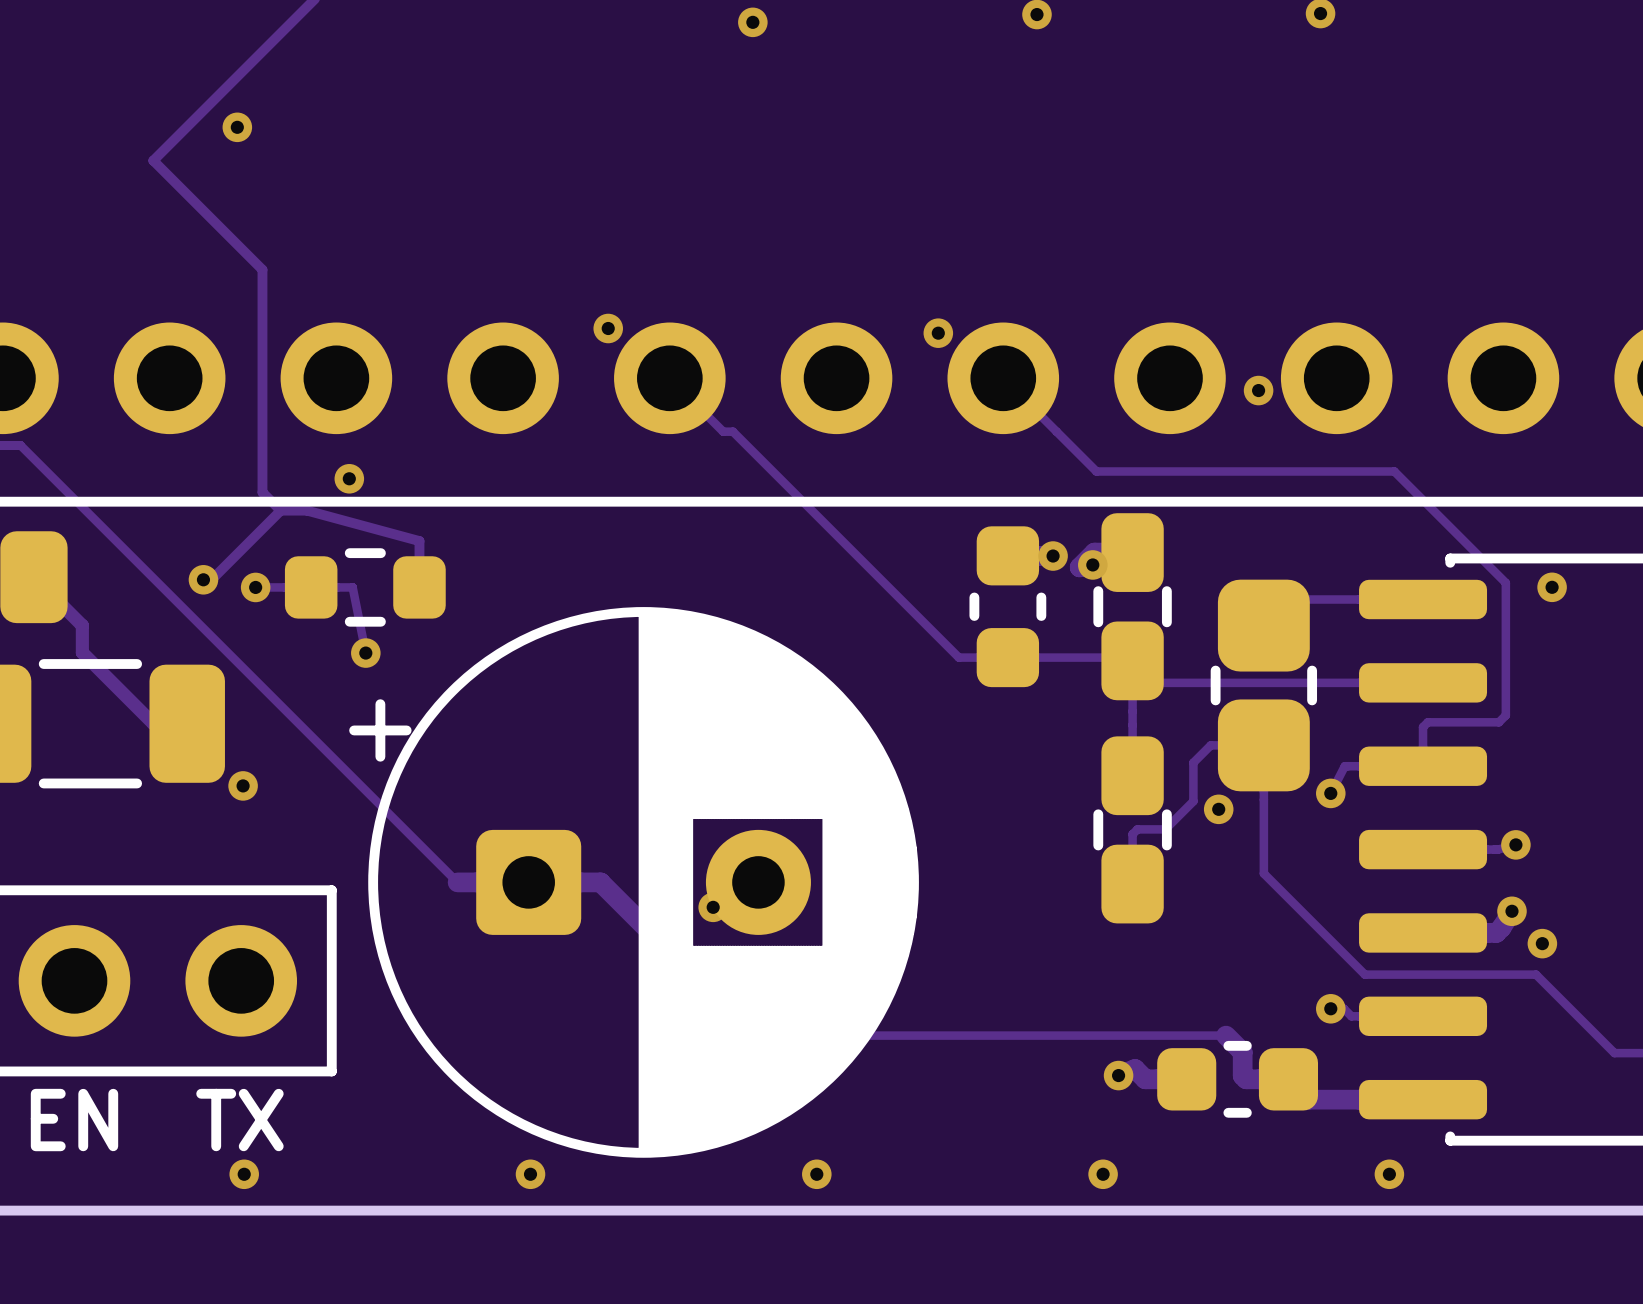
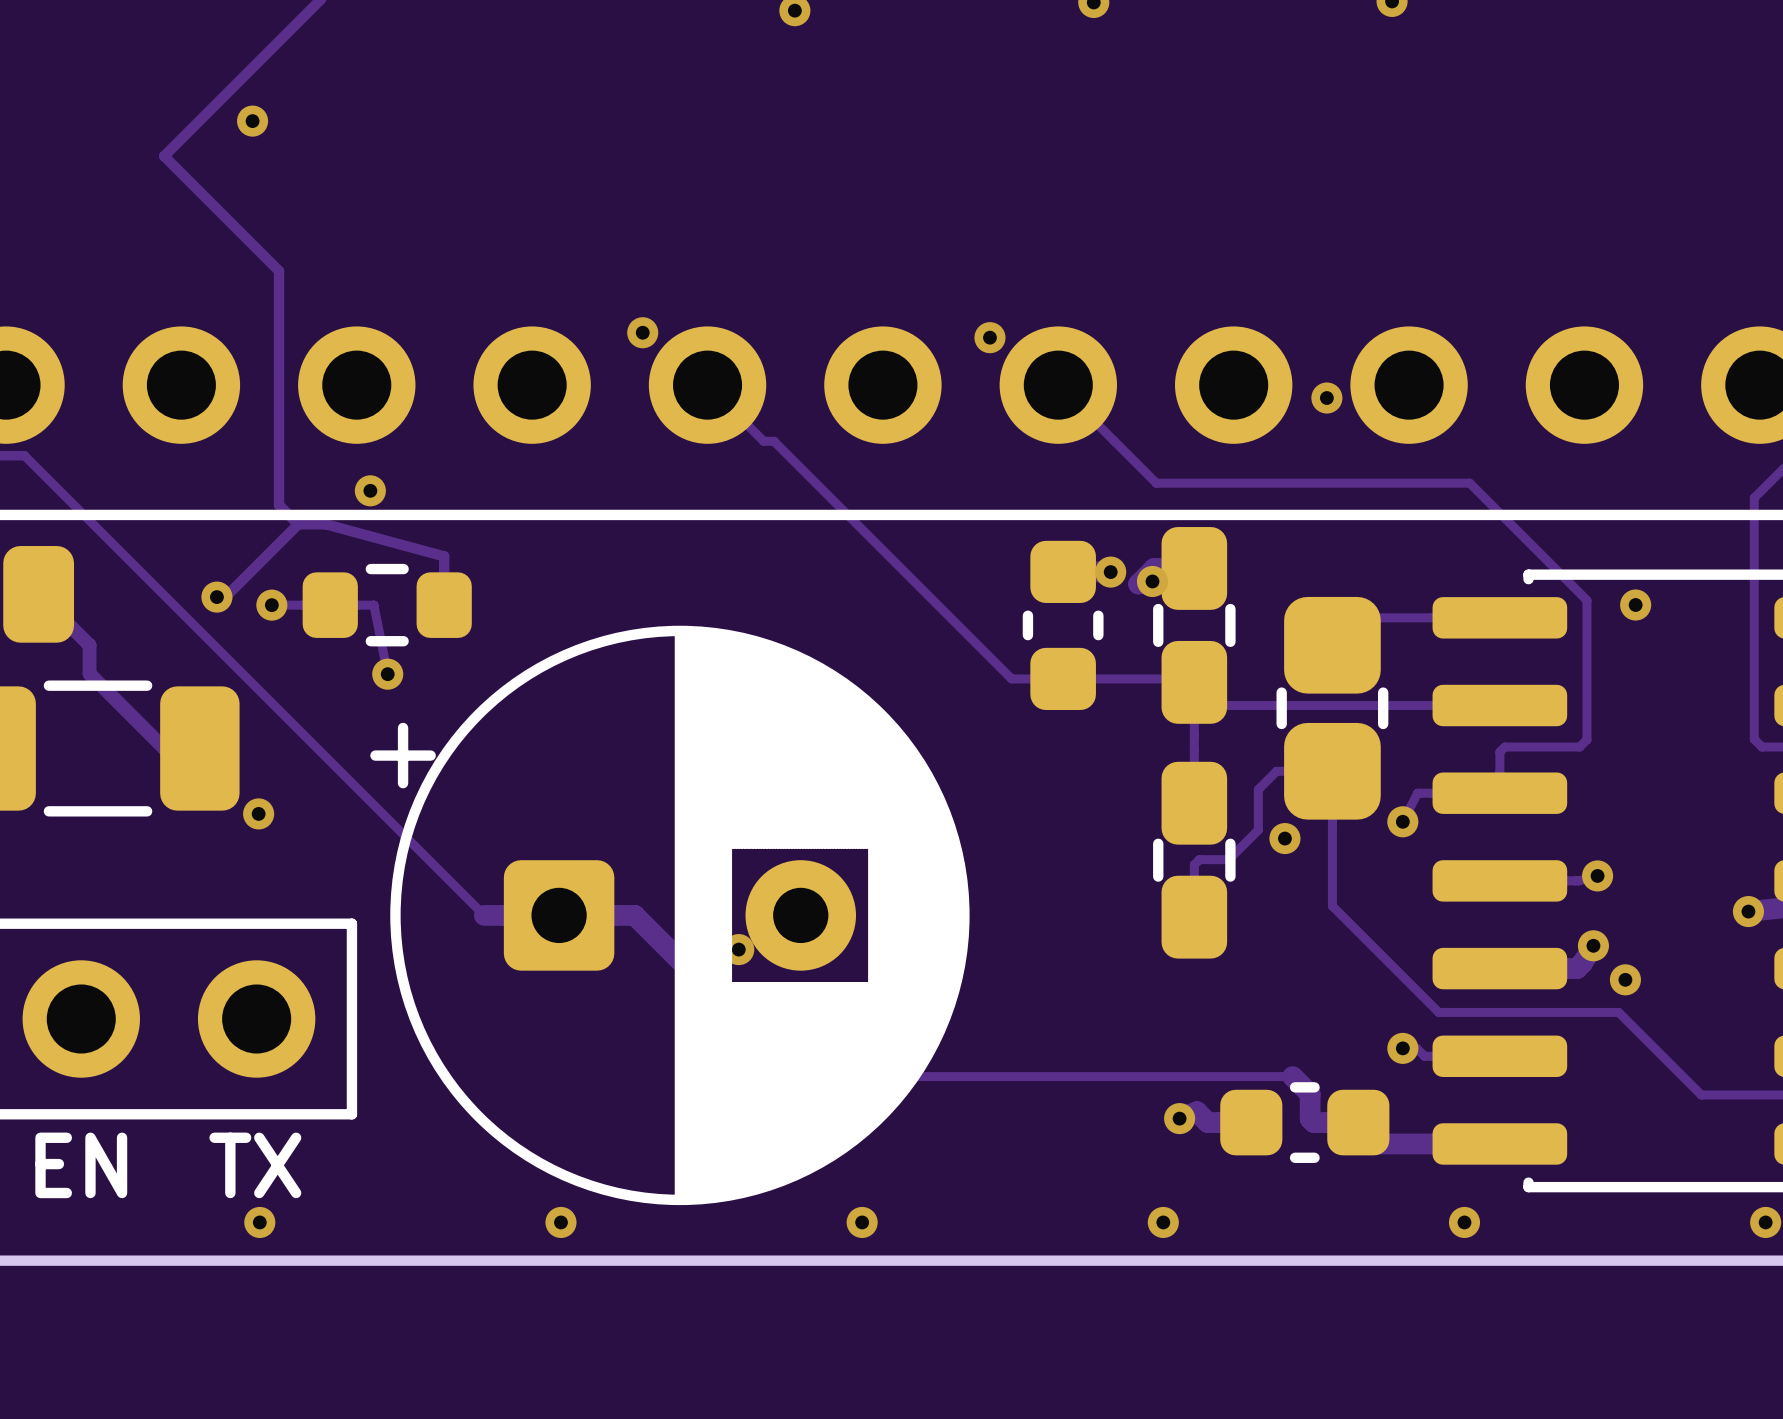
via position: (713, 907) -> (738, 949)

